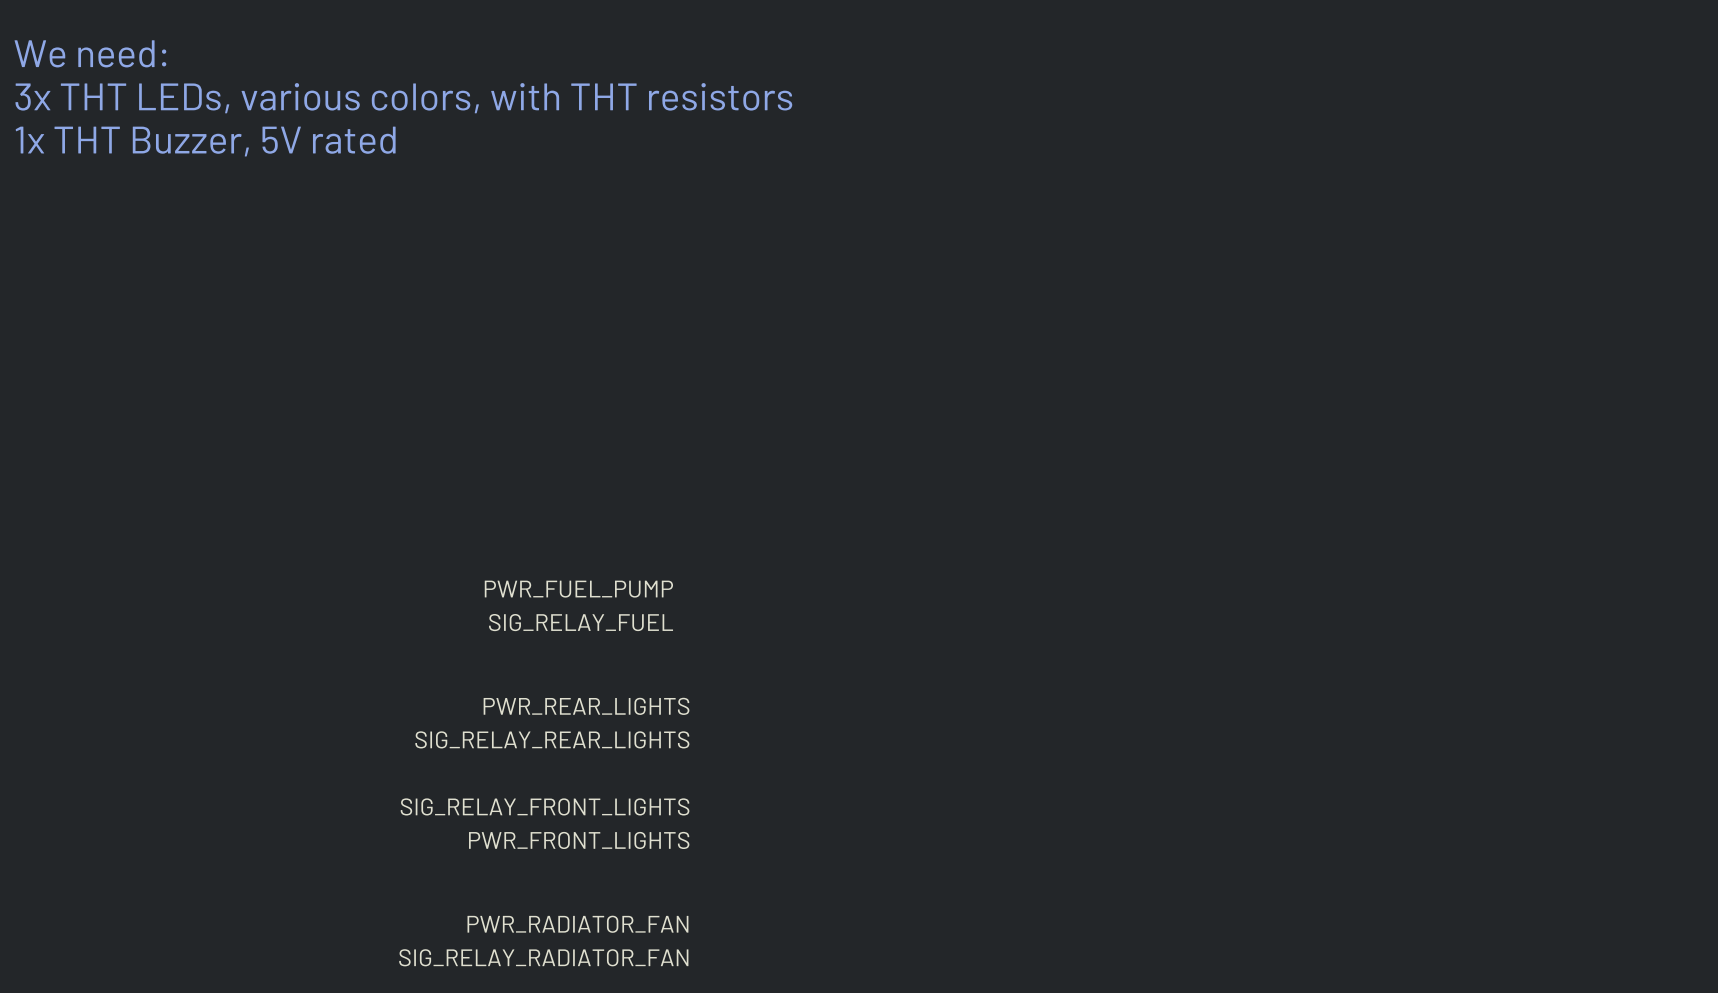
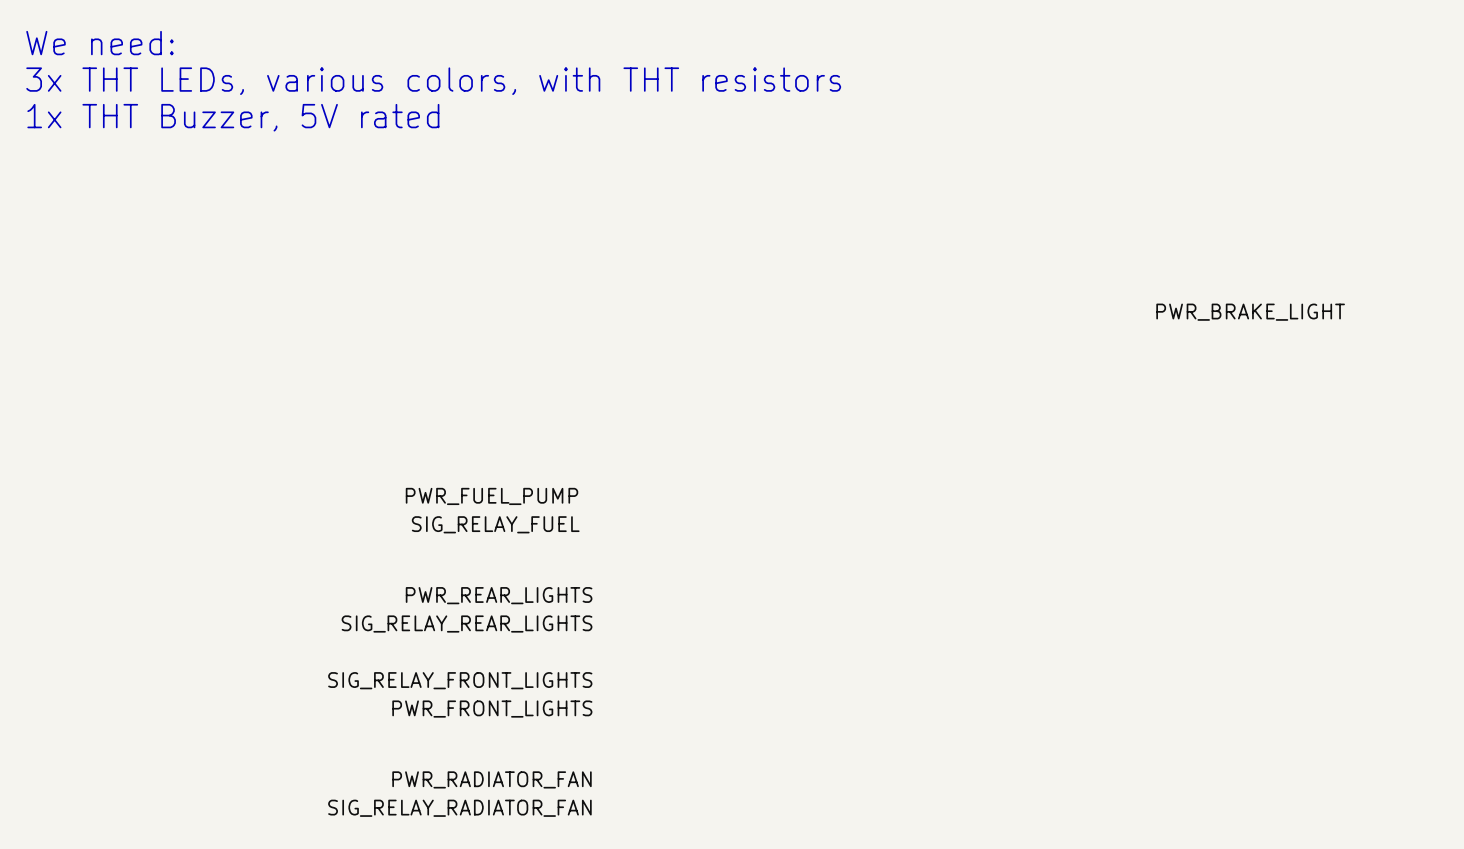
label: none -> PWR_BRAKE_LIGHT (1250, 312)

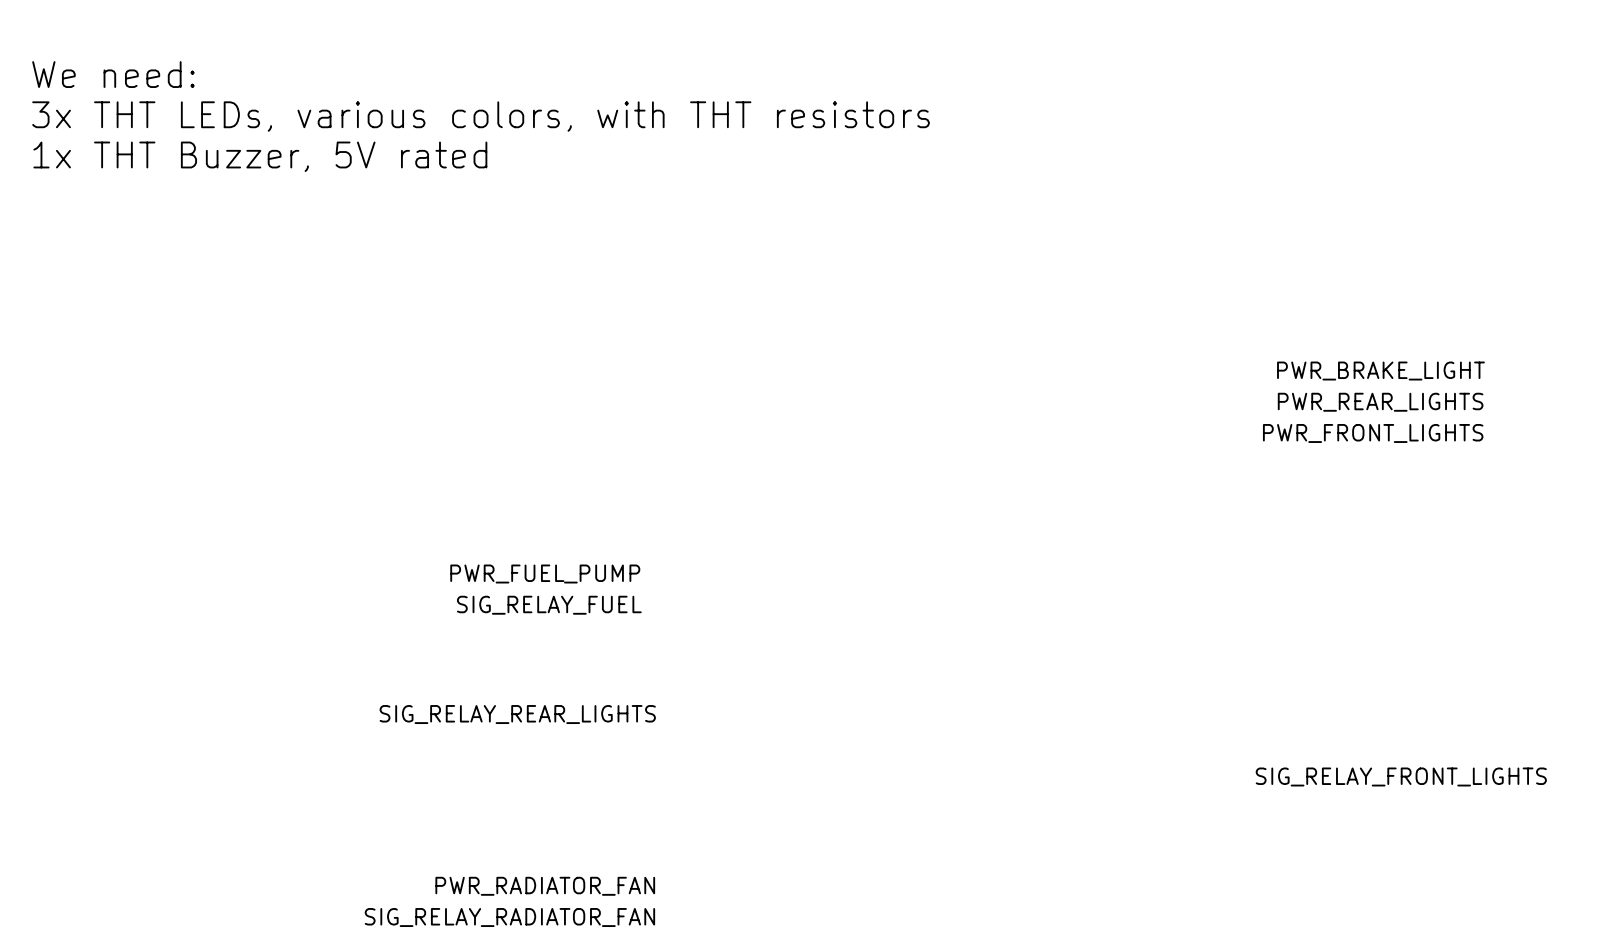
label: none -> PWR_REAR_LIGHTS (1380, 402)
label: none -> PWR_FRONT_LIGHTS (1373, 433)
label: PWR_REAR_LIGHTS (499, 595) -> none
label: SIG_RELAY_FRONT_LIGHTS (460, 680) -> none
label: none -> SIG_RELAY_FRONT_LIGHTS (1401, 776)
label: PWR_FRONT_LIGHTS (492, 709) -> none

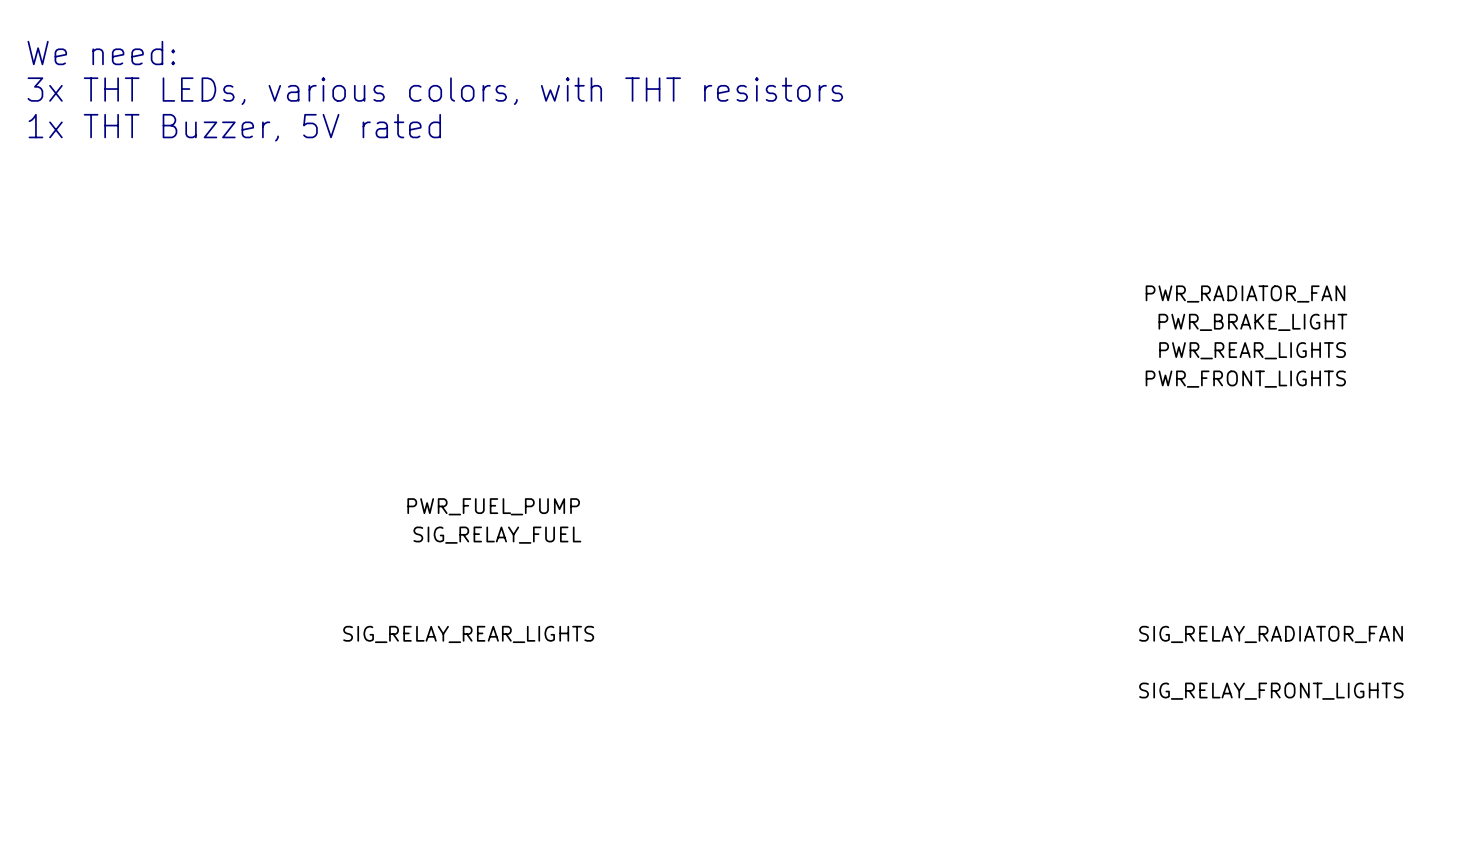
label: none -> PWR_RADIATOR_FAN (1245, 294)
label: none -> SIG_RELAY_RADIATOR_FAN (1271, 634)
label: PWR_RADIATOR_FAN (545, 886) -> none
label: SIG_RELAY_RADIATOR_FAN (509, 917) -> none

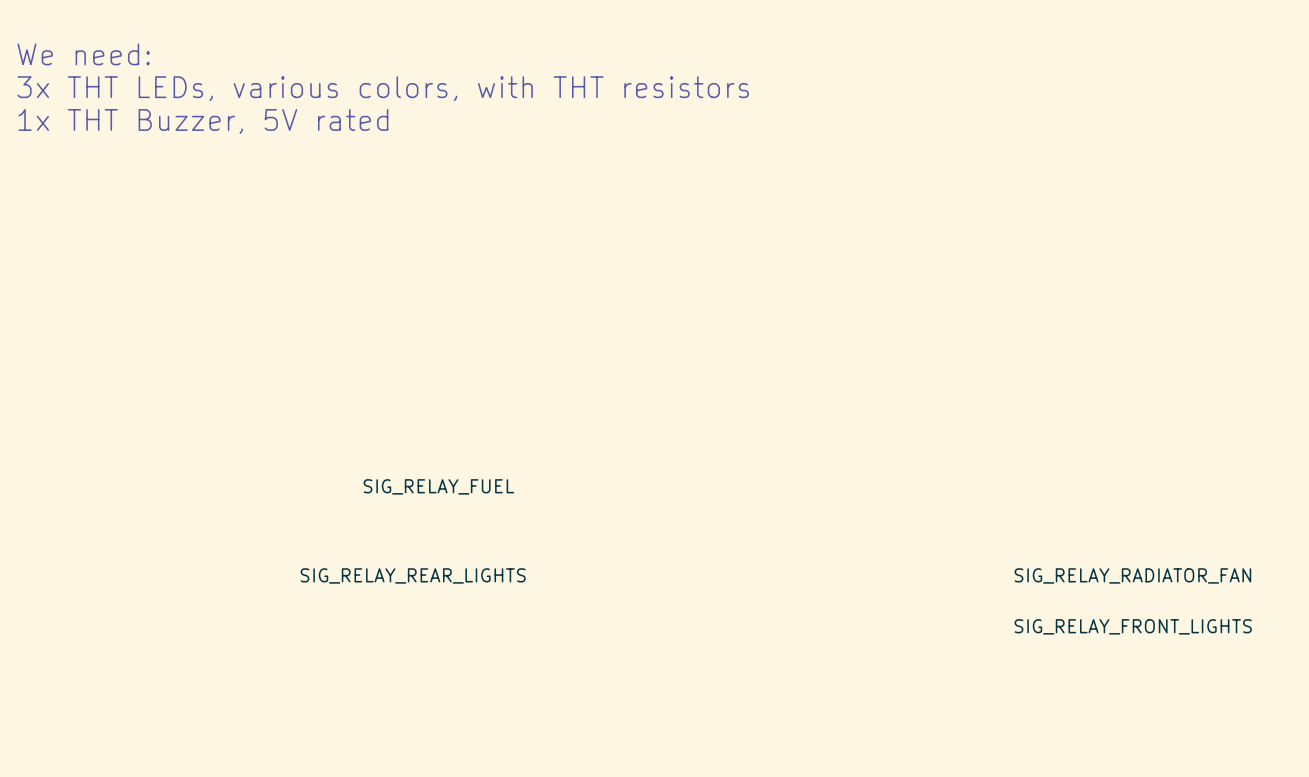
label: PWR_RADIATOR_FAN (1245, 294) -> none
label: PWR_BRAKE_LIGHT (1252, 322) -> none
label: PWR_REAR_LIGHTS (1252, 350) -> none
label: PWR_FRONT_LIGHTS (1245, 379) -> none
label: PWR_FUEL_PUMP (493, 506) -> none

